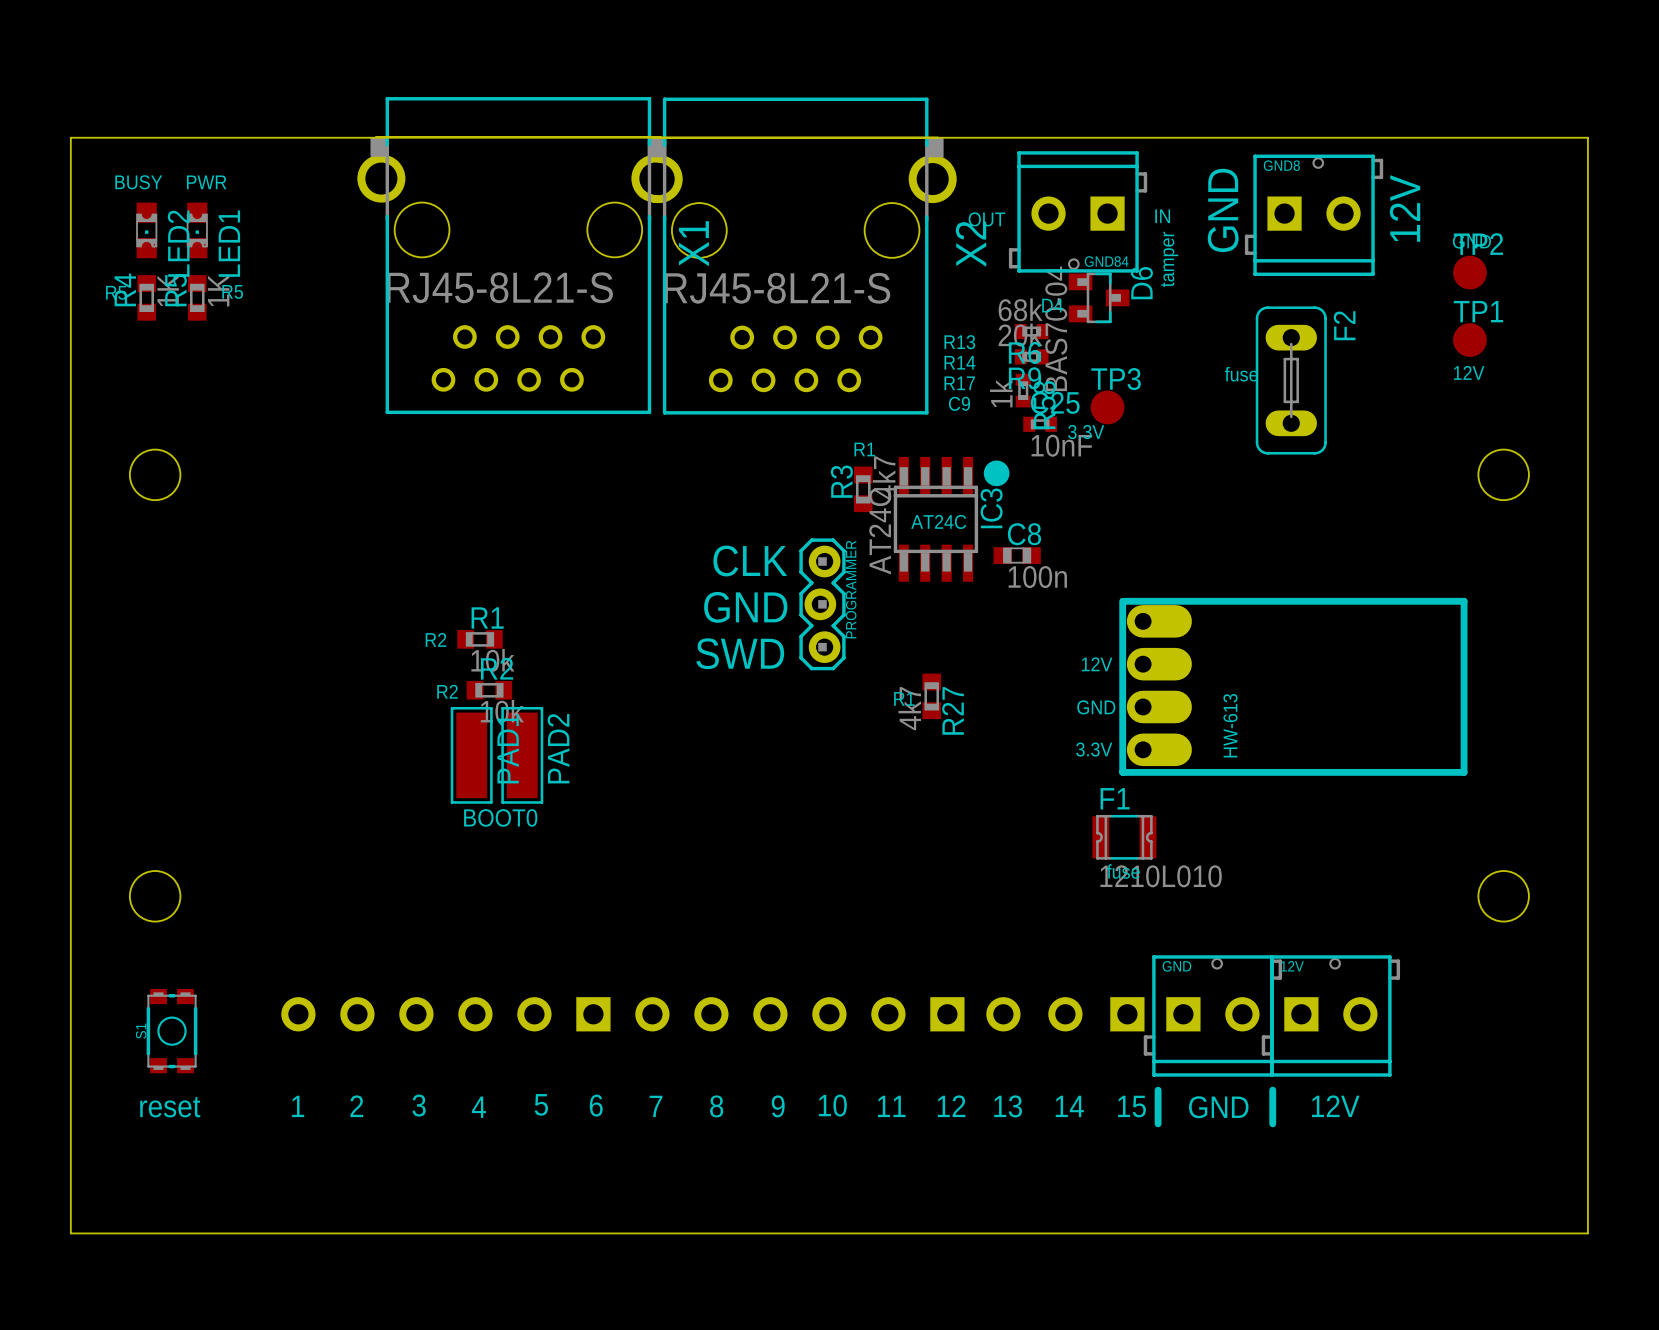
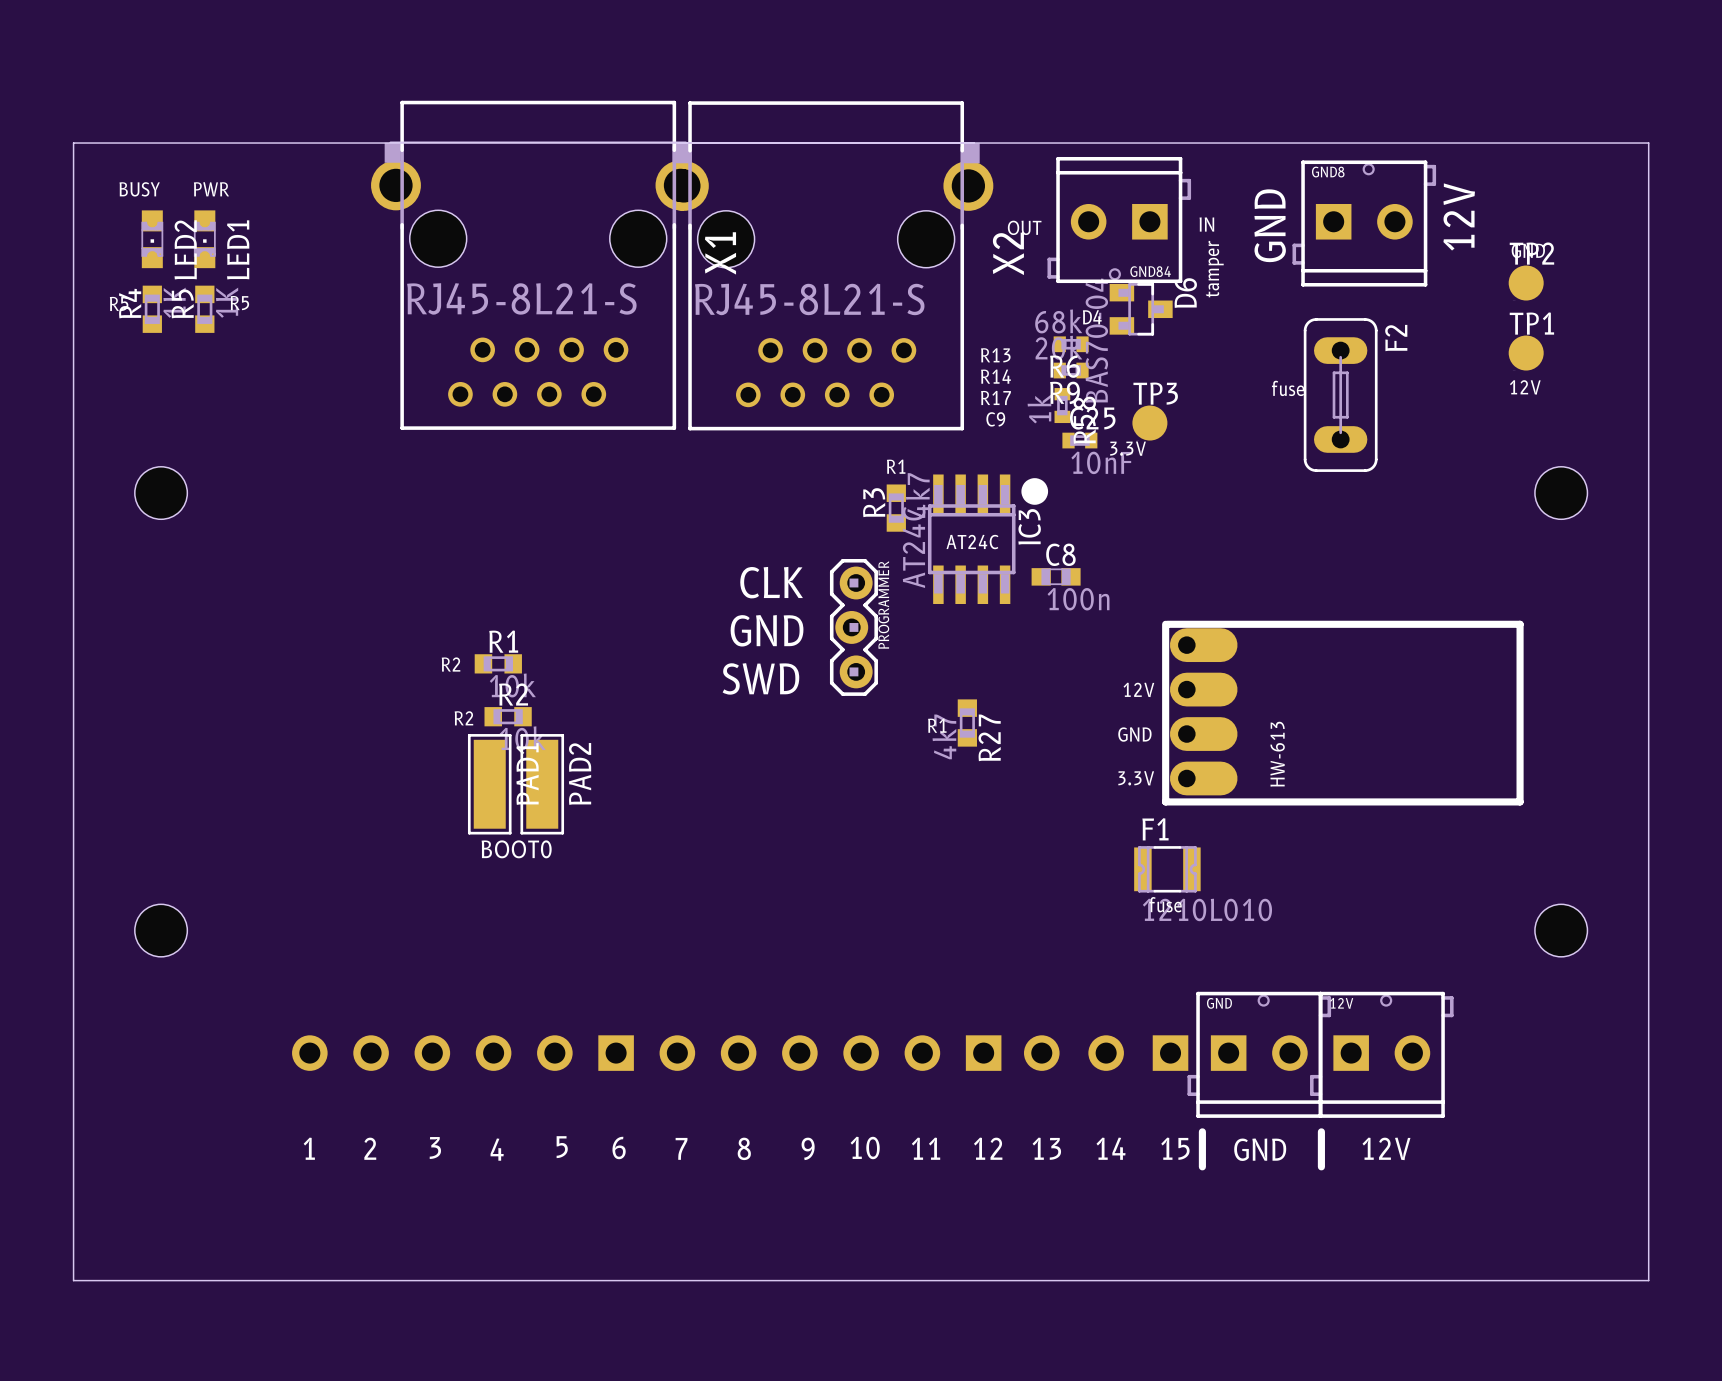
S1: (172, 1031) -> none
text: reset (170, 1107) -> none

